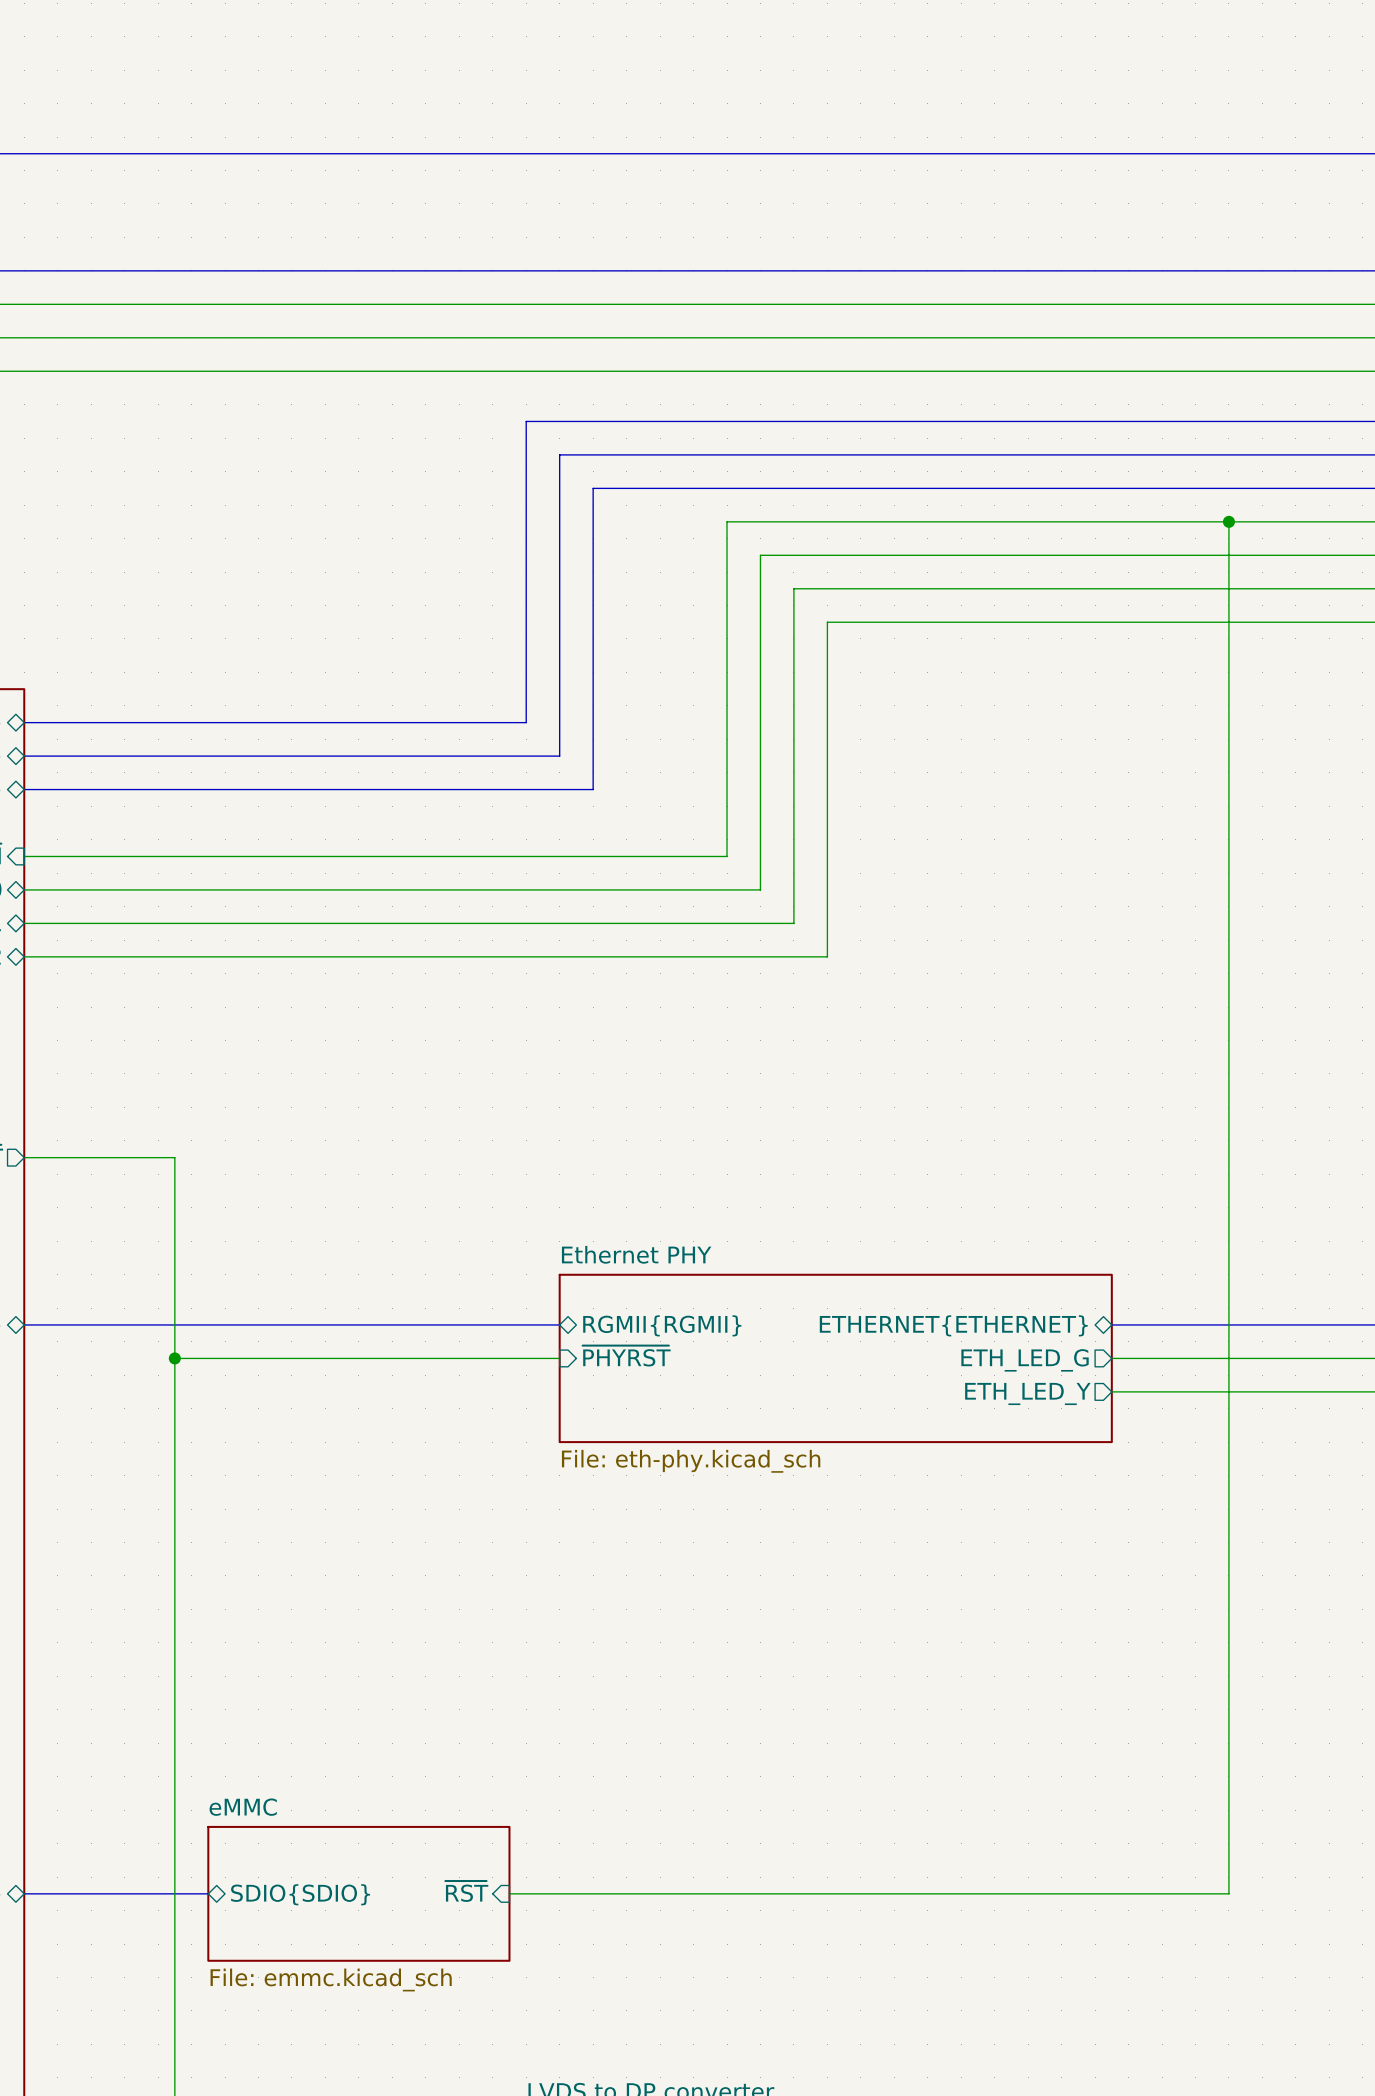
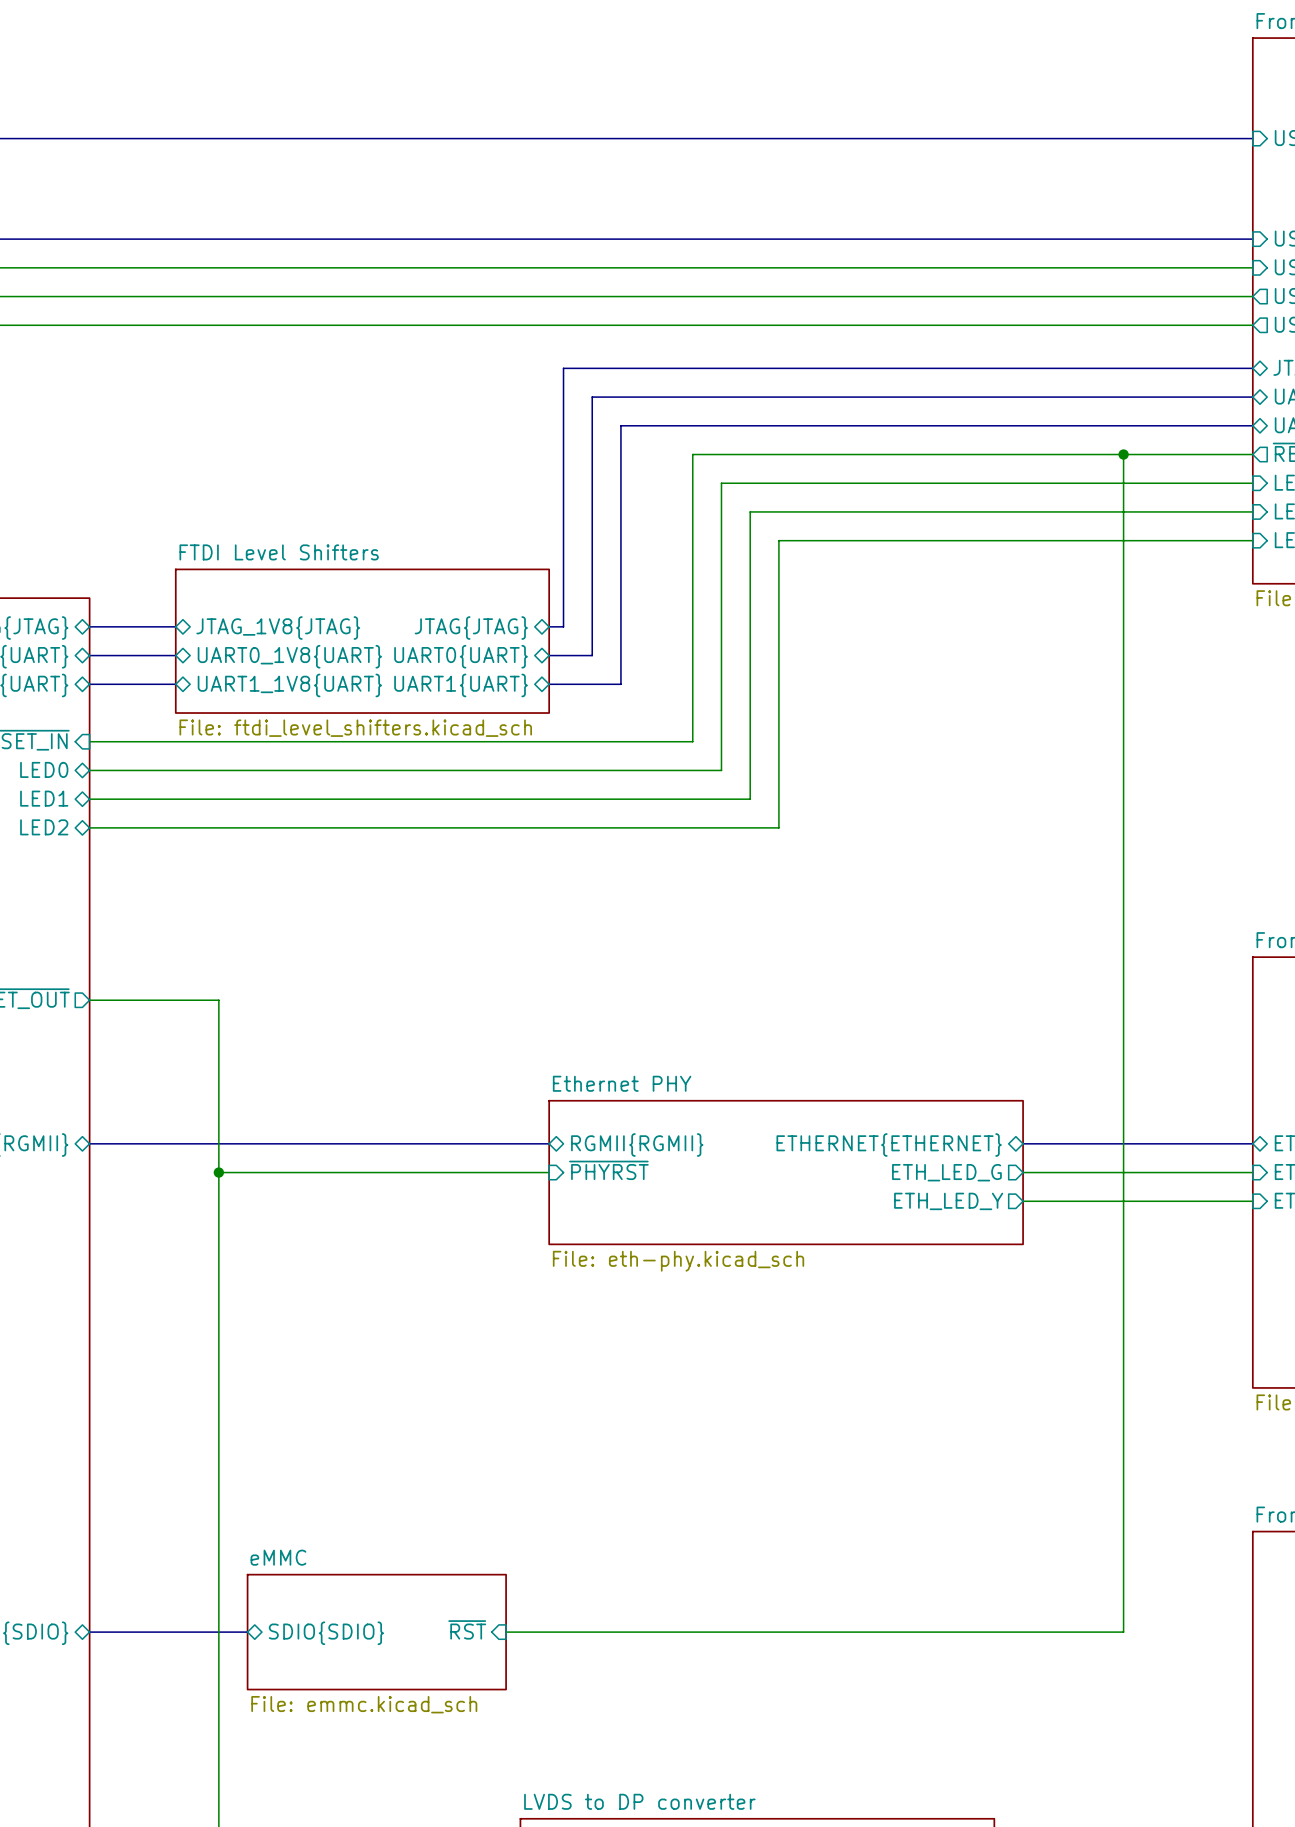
bus: (576, 421) (526, 421) (526, 722) (124, 722) -> (563, 368) (563, 626) (549, 626)
bus: (609, 454) (559, 454) (559, 756) (124, 756) -> (592, 397) (592, 655) (549, 655)
bus: (643, 488) (593, 488) (593, 789) -> (620, 425) (620, 684) (577, 684)
sheet pin: none -> JTAG{JTAG} (471, 628)
sheet pin: none -> JTAG_1V8{JTAG} (278, 628)
sheet FTDI Level Shifters: none -> File: ftdi_level_shifters.kicad_sch (362, 641)
sheet pin: none -> UART0{UART} (461, 656)
sheet pin: none -> UART0_1V8{UART} (289, 656)
bus: (124, 789) (559, 789) -> none
sheet pin: none -> UART1{UART} (461, 685)
sheet pin: none -> UART1_1V8{UART} (289, 685)

